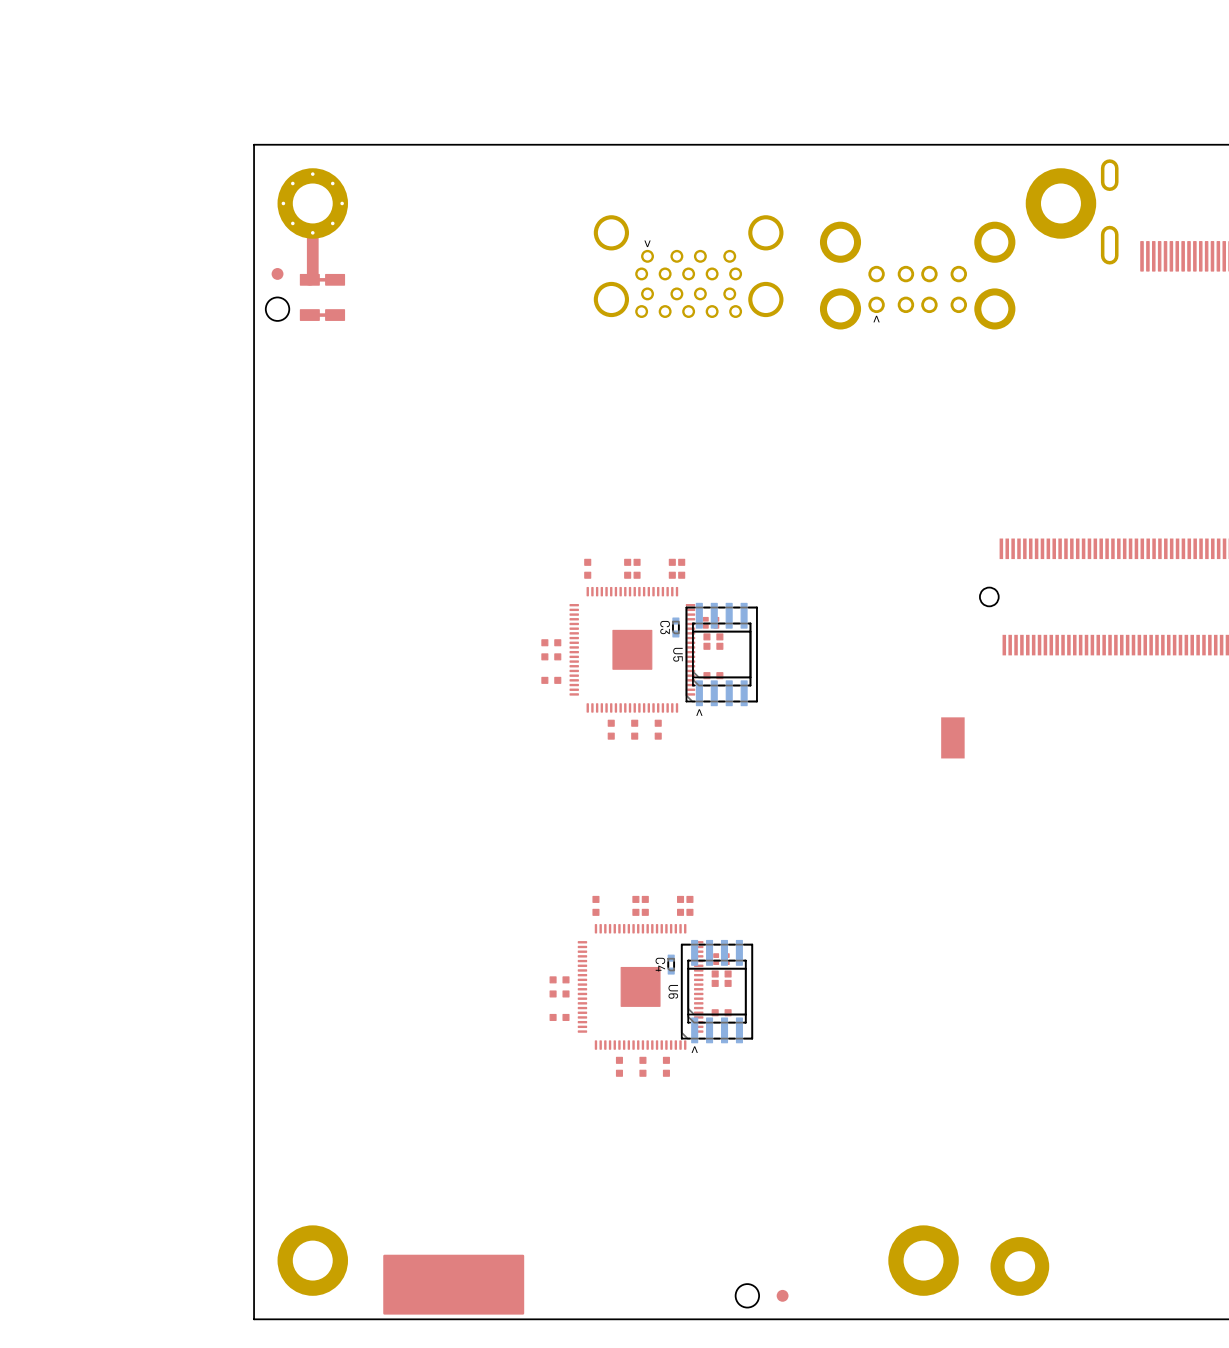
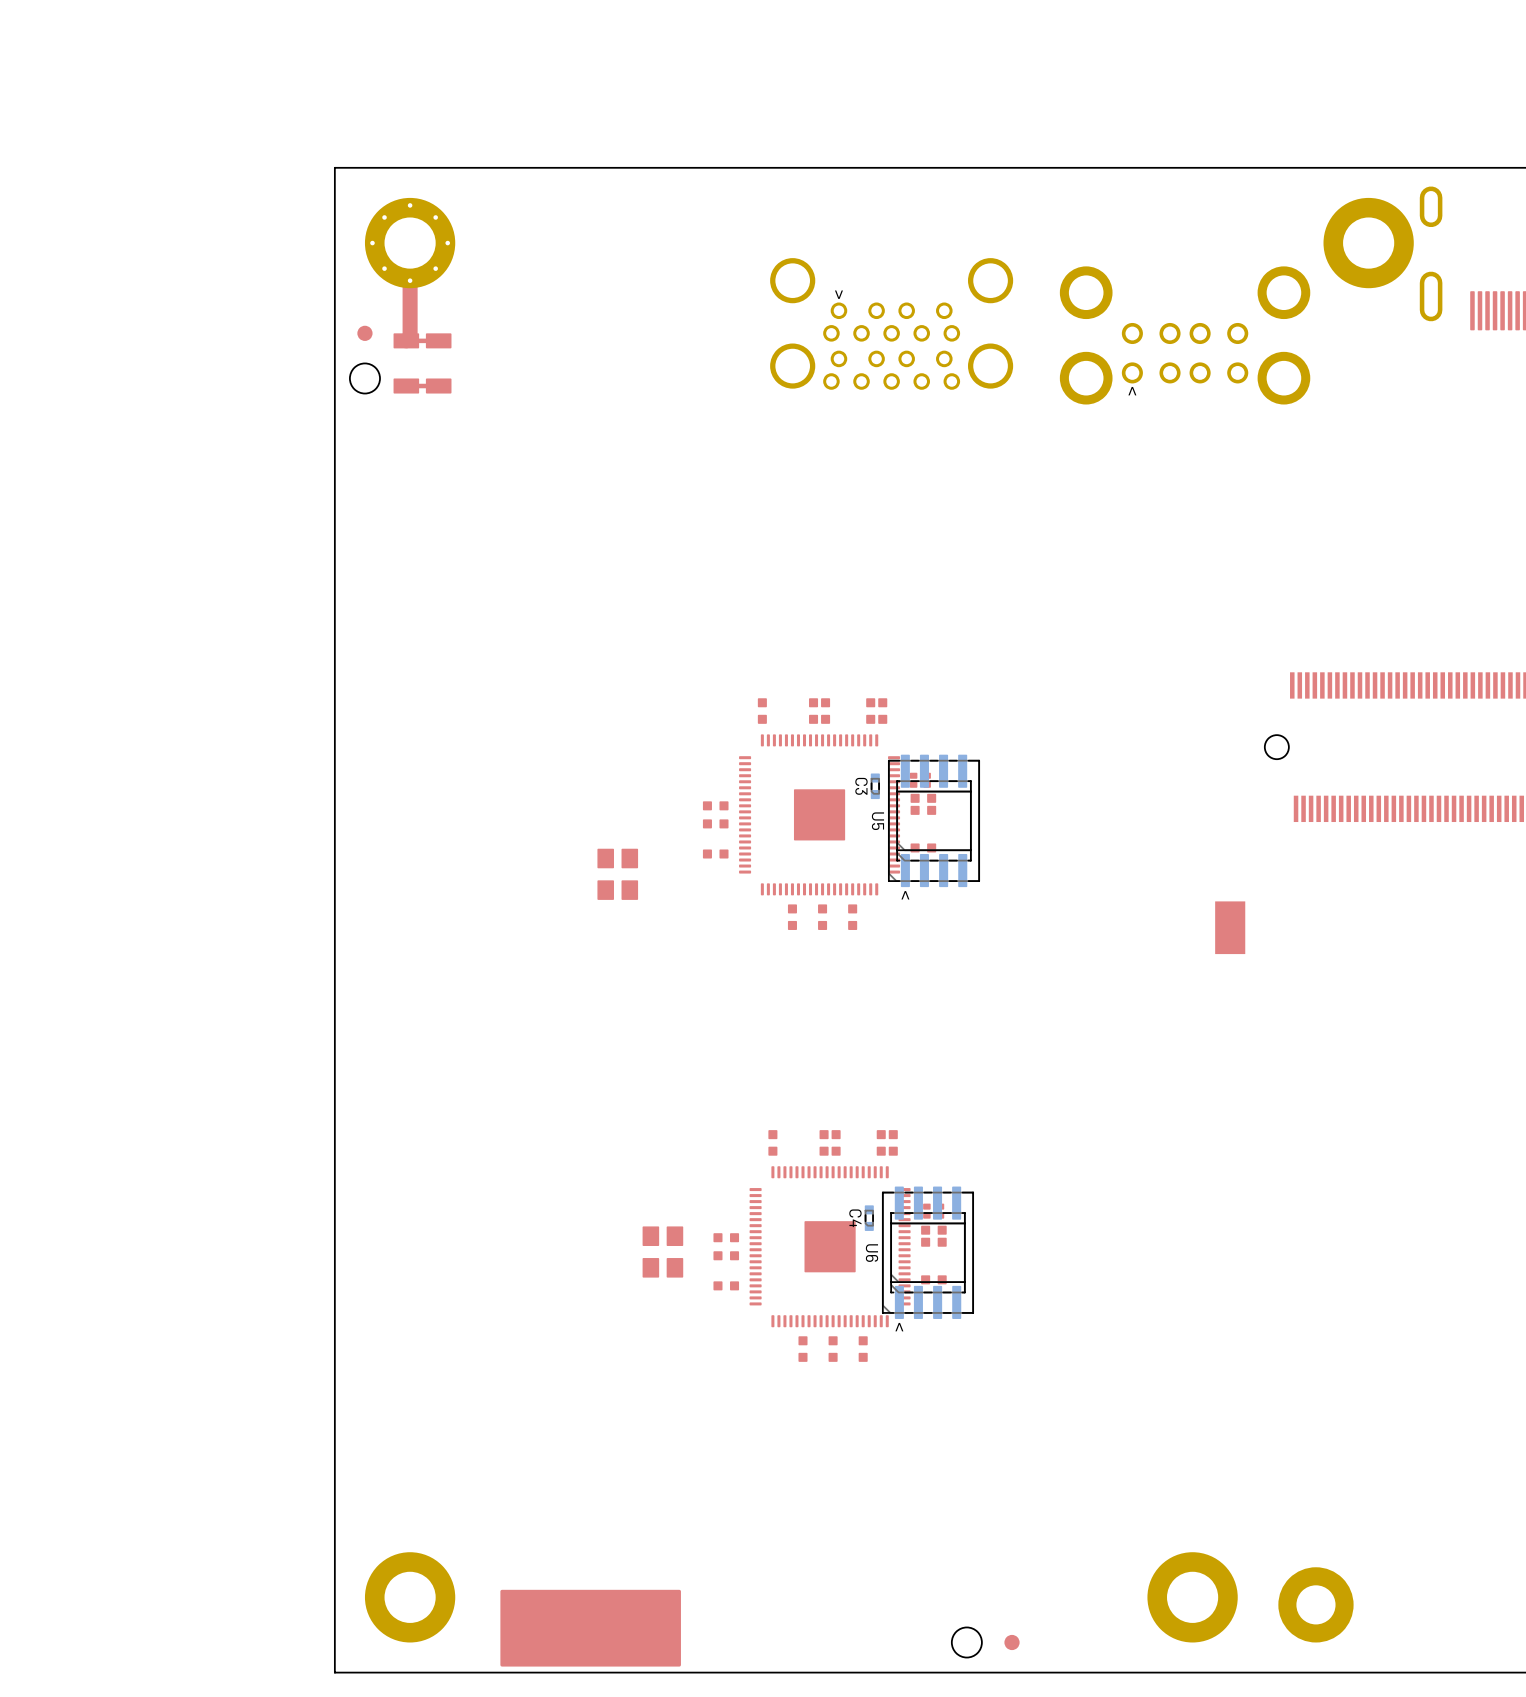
part: none -> (617, 874)
part: none -> (662, 1252)

